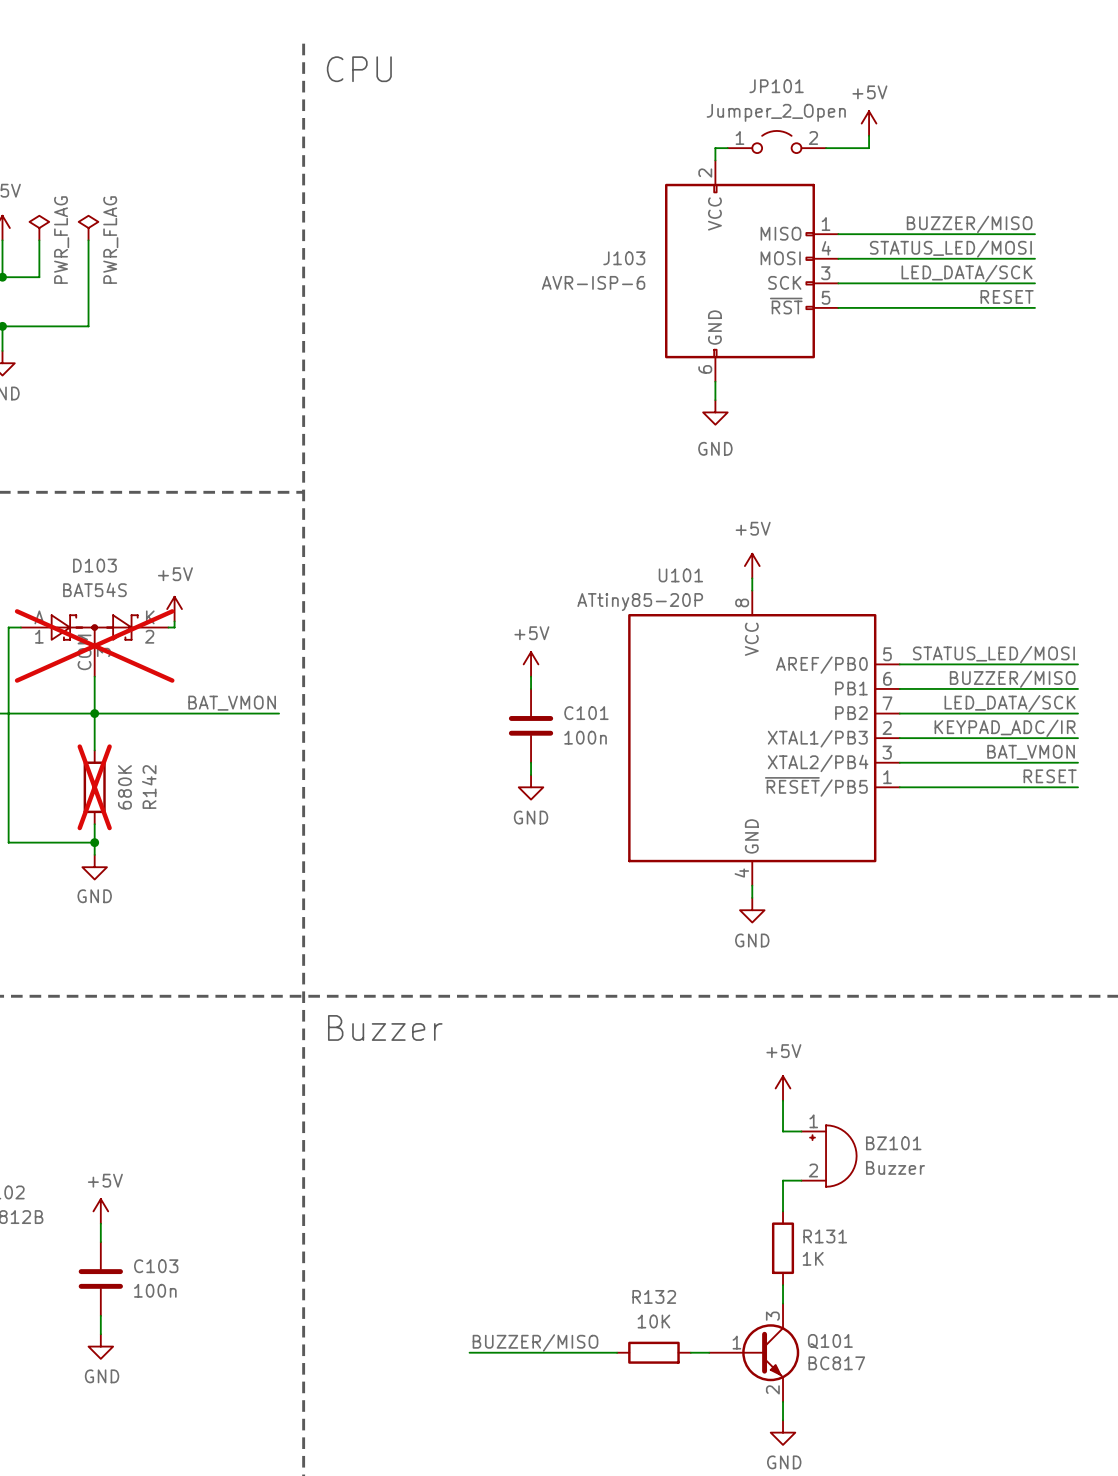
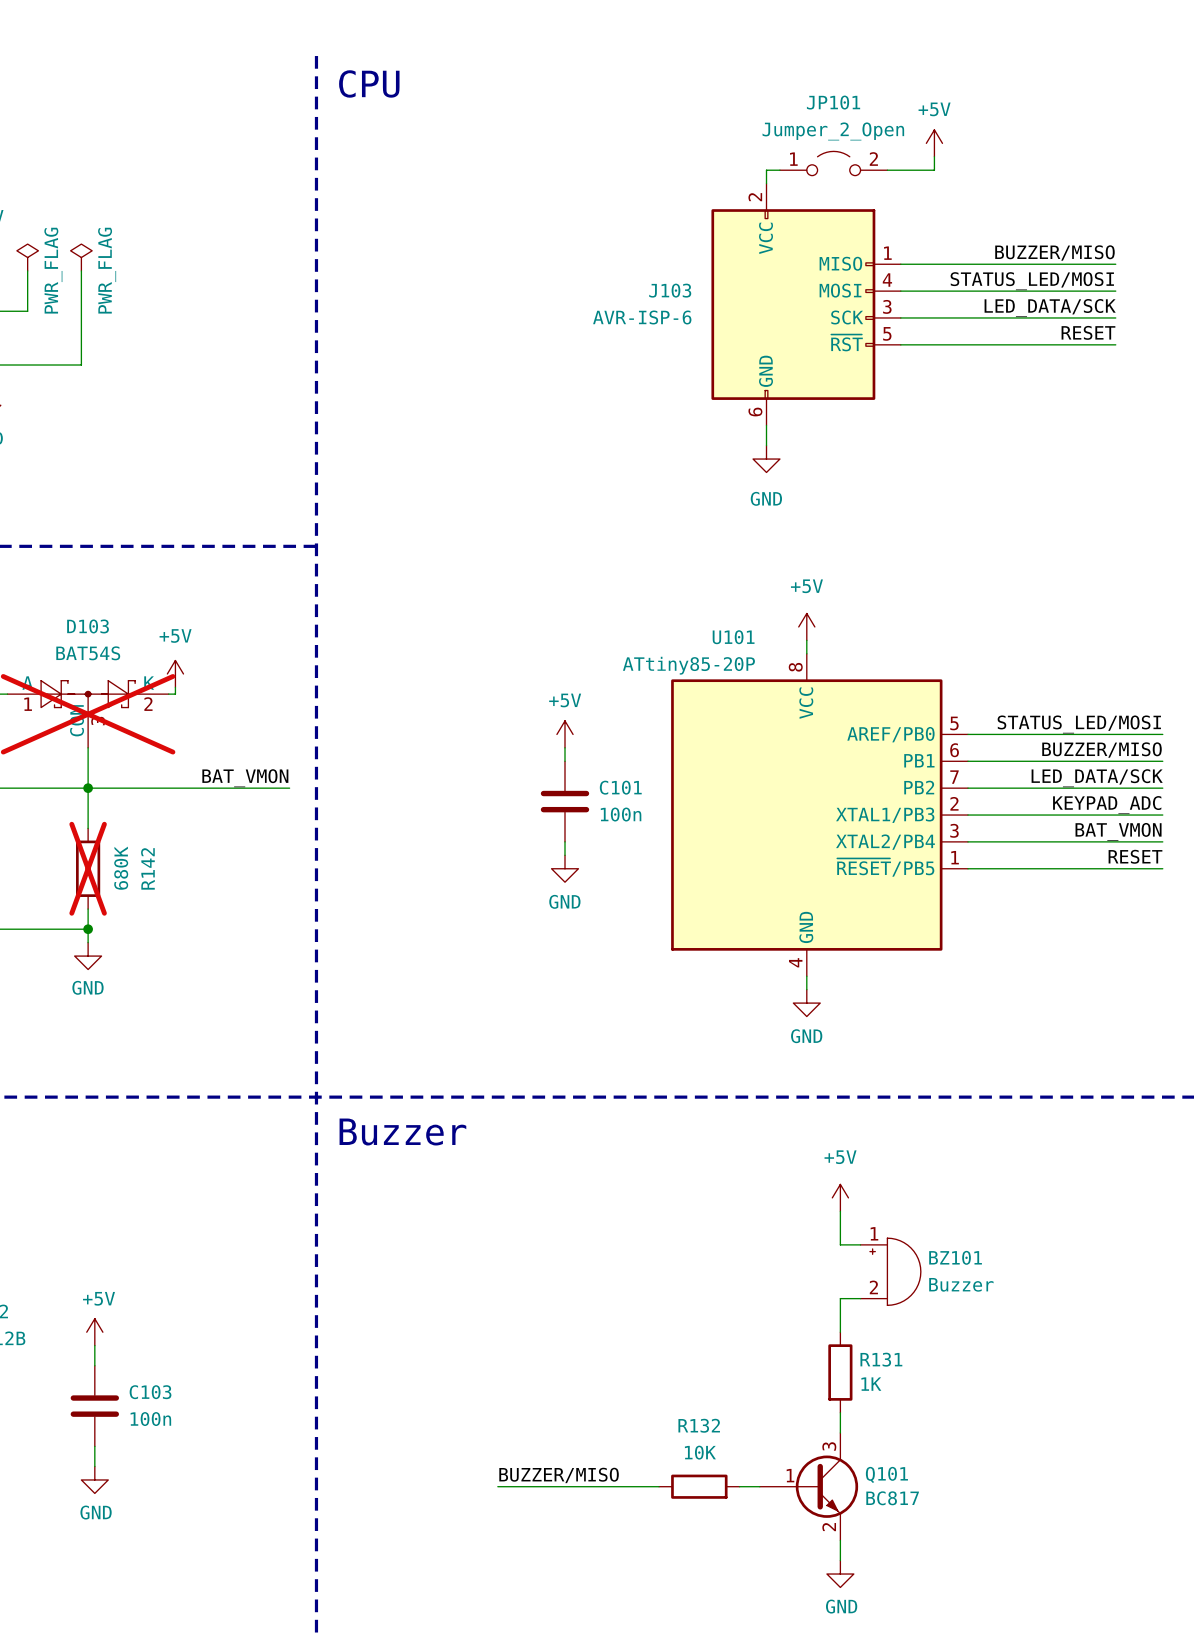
label: KEYPAD_ADC/IR (1005, 728) -> KEYPAD_ADC (1107, 805)

